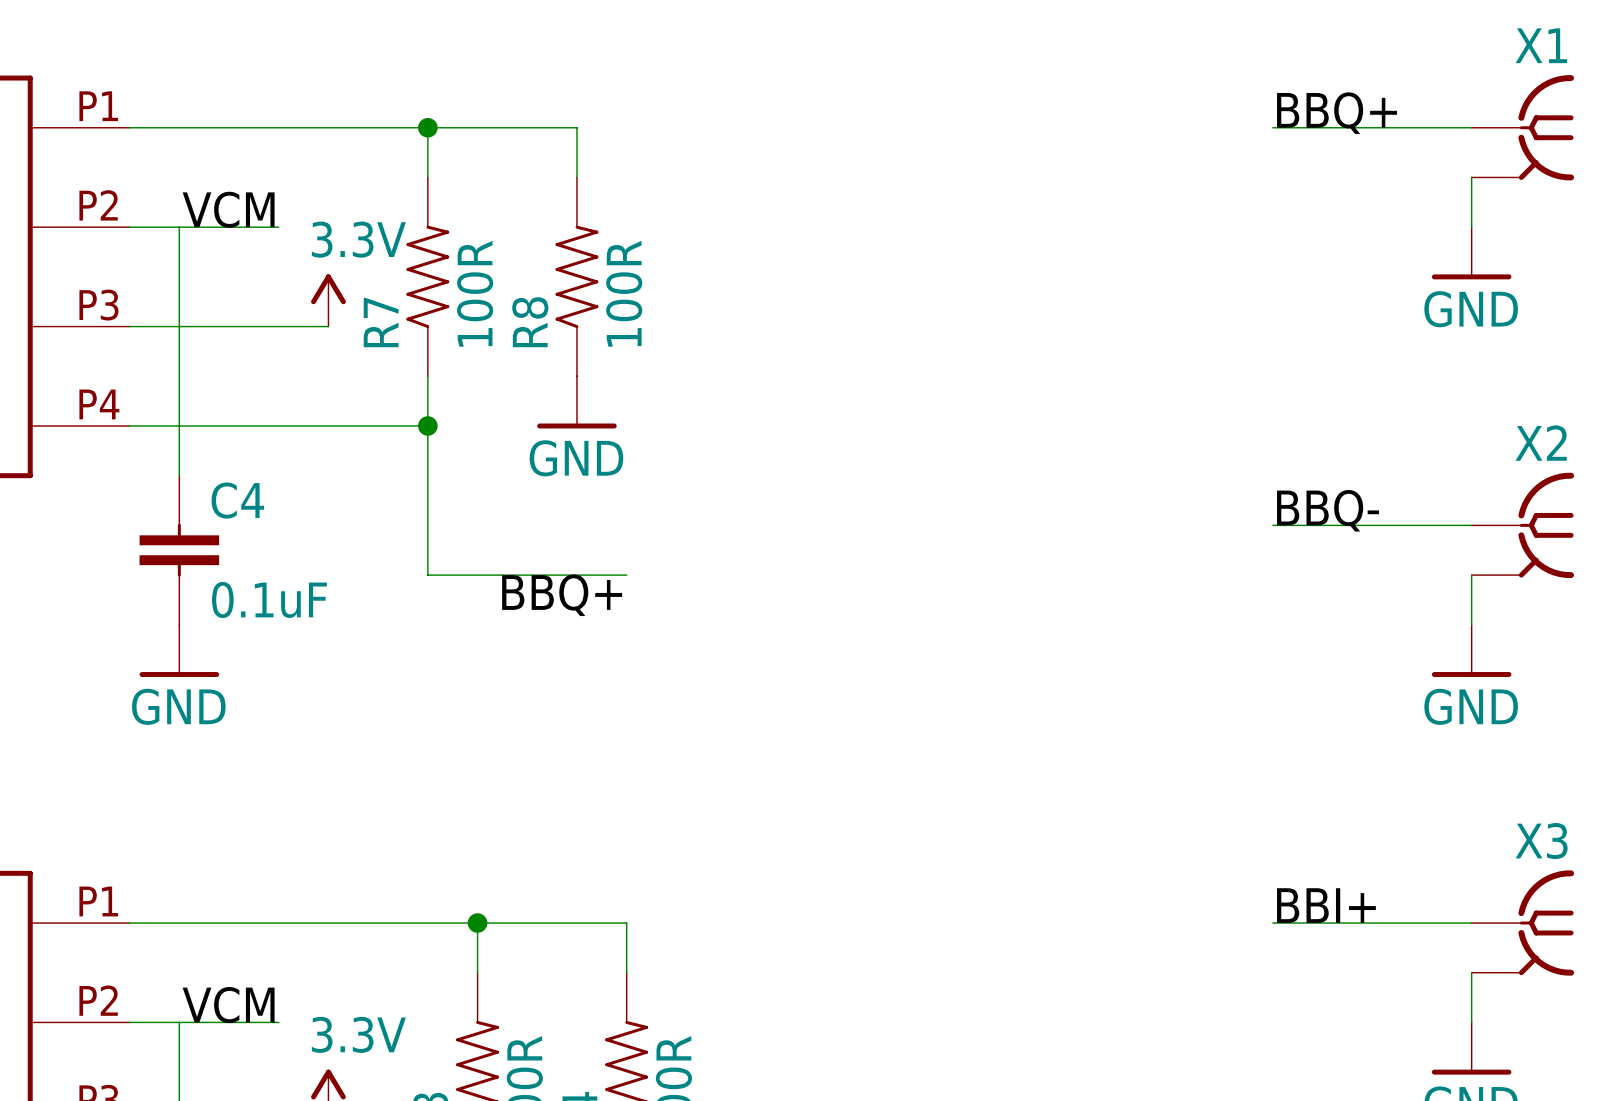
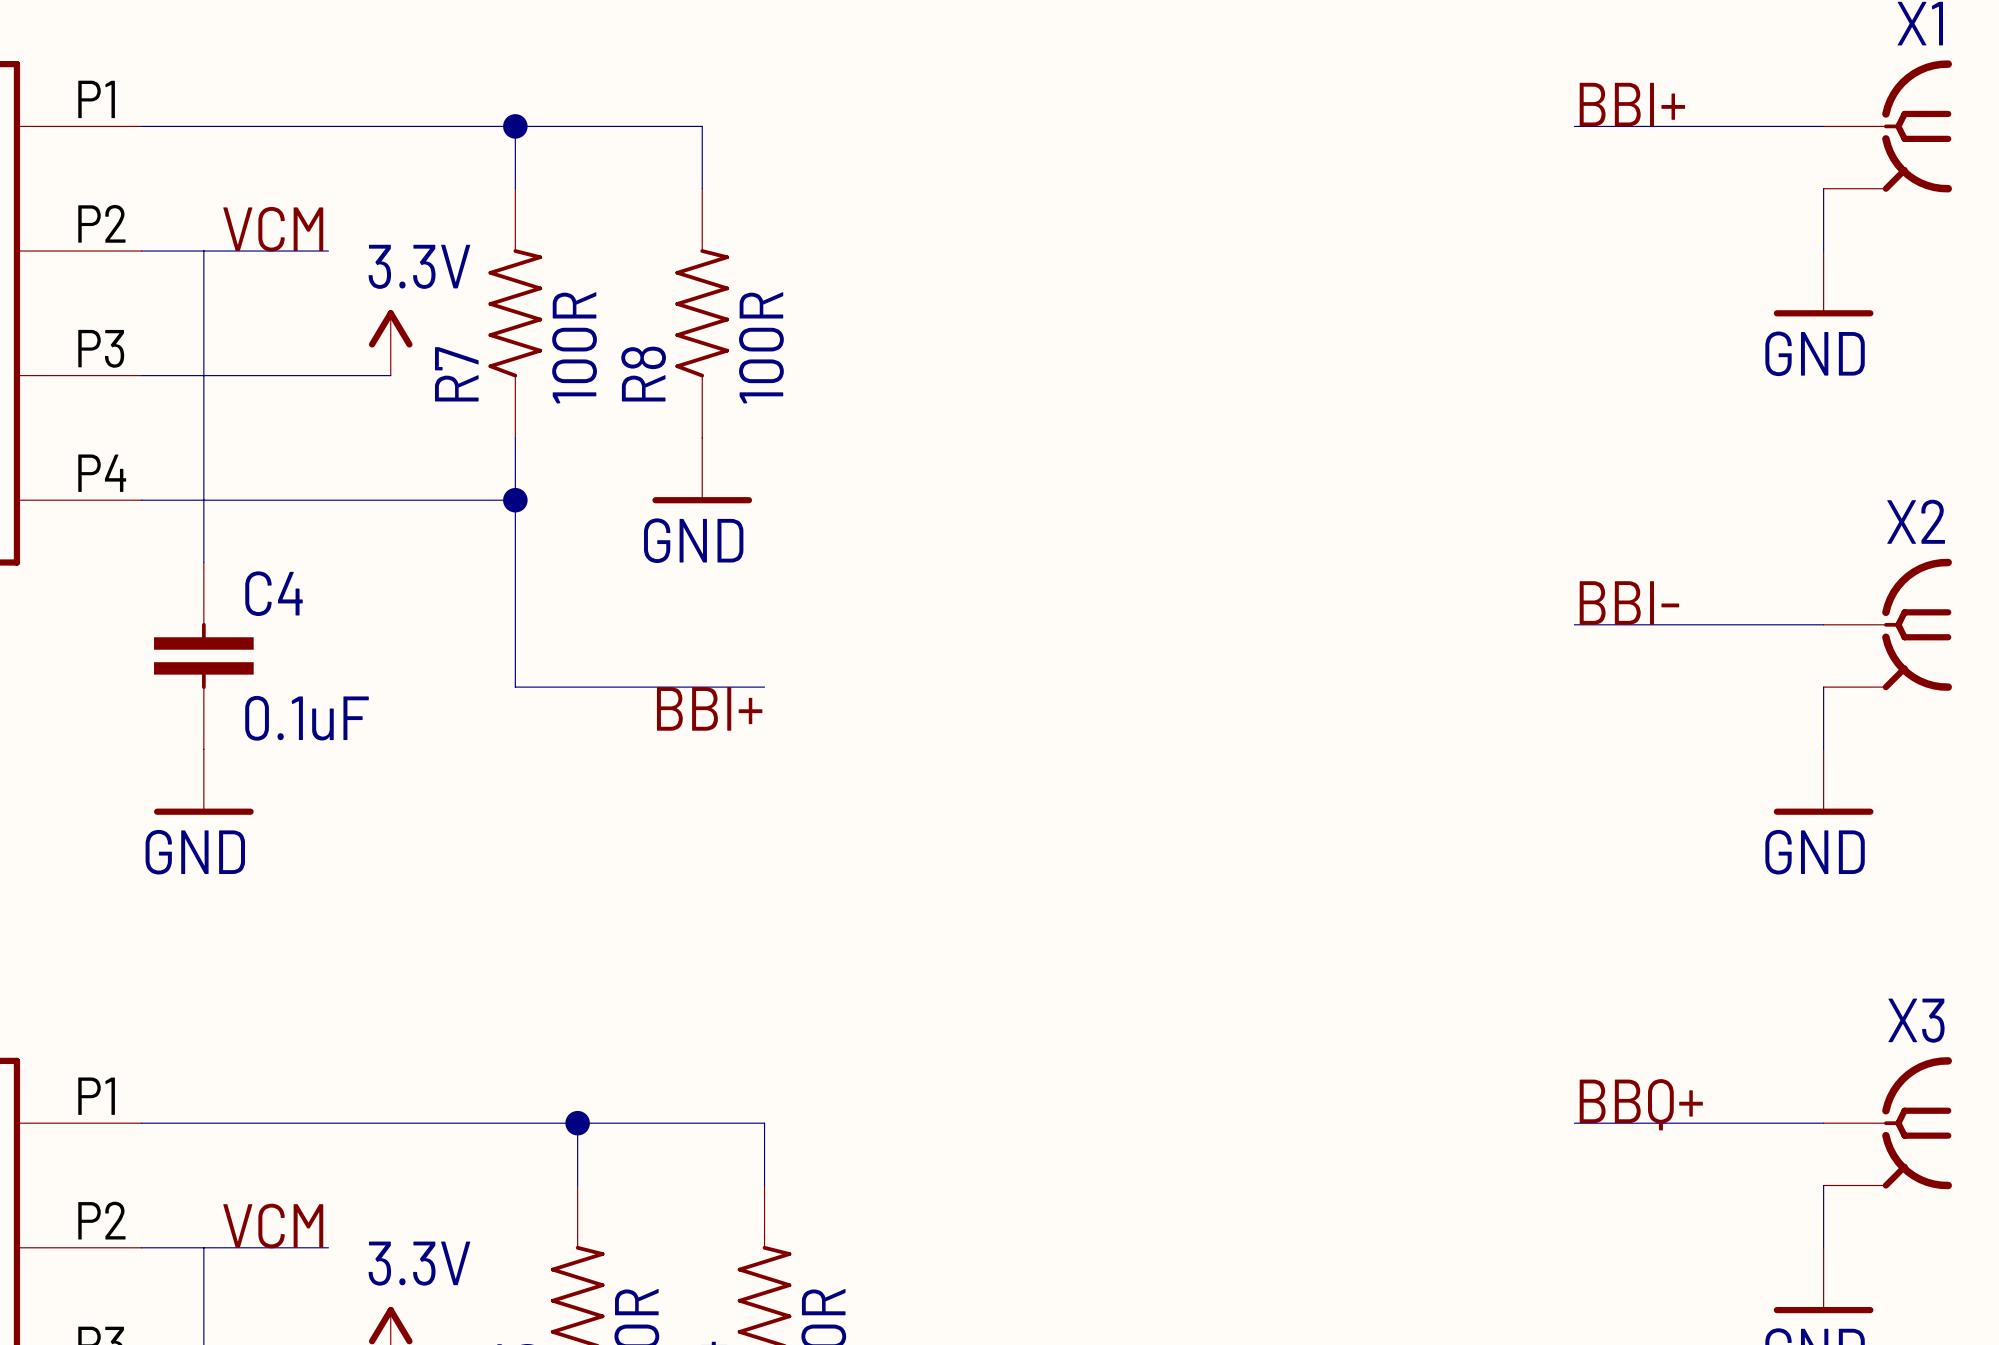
label: BBQ+ (1337, 113) -> BBI+ (1632, 104)
label: BBQ- (1328, 510) -> BBI- (1629, 603)
label: BBQ+ (562, 595) -> BBI+ (709, 708)
label: BBI+ (1326, 905) -> BBQ+ (1641, 1104)

